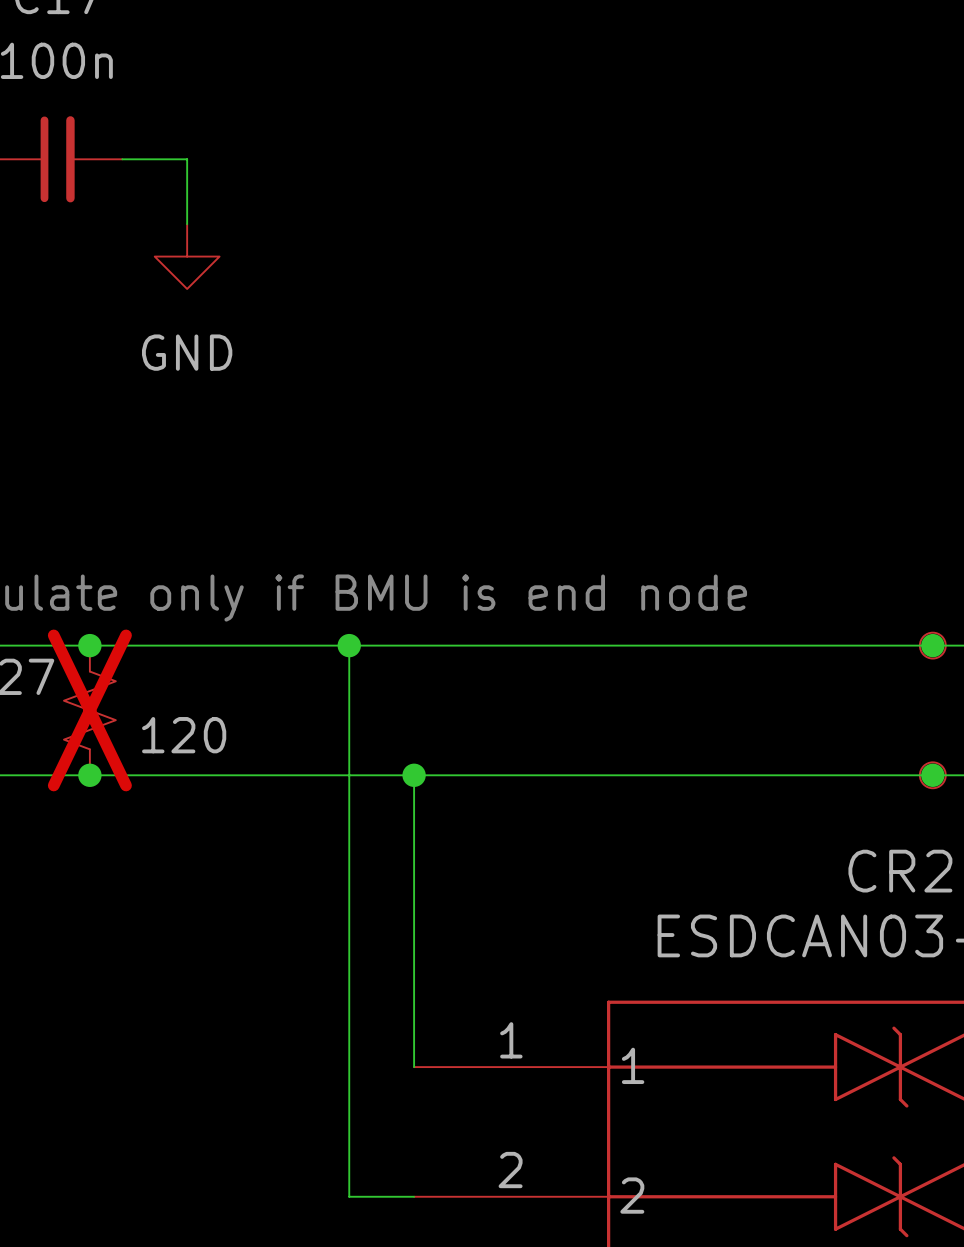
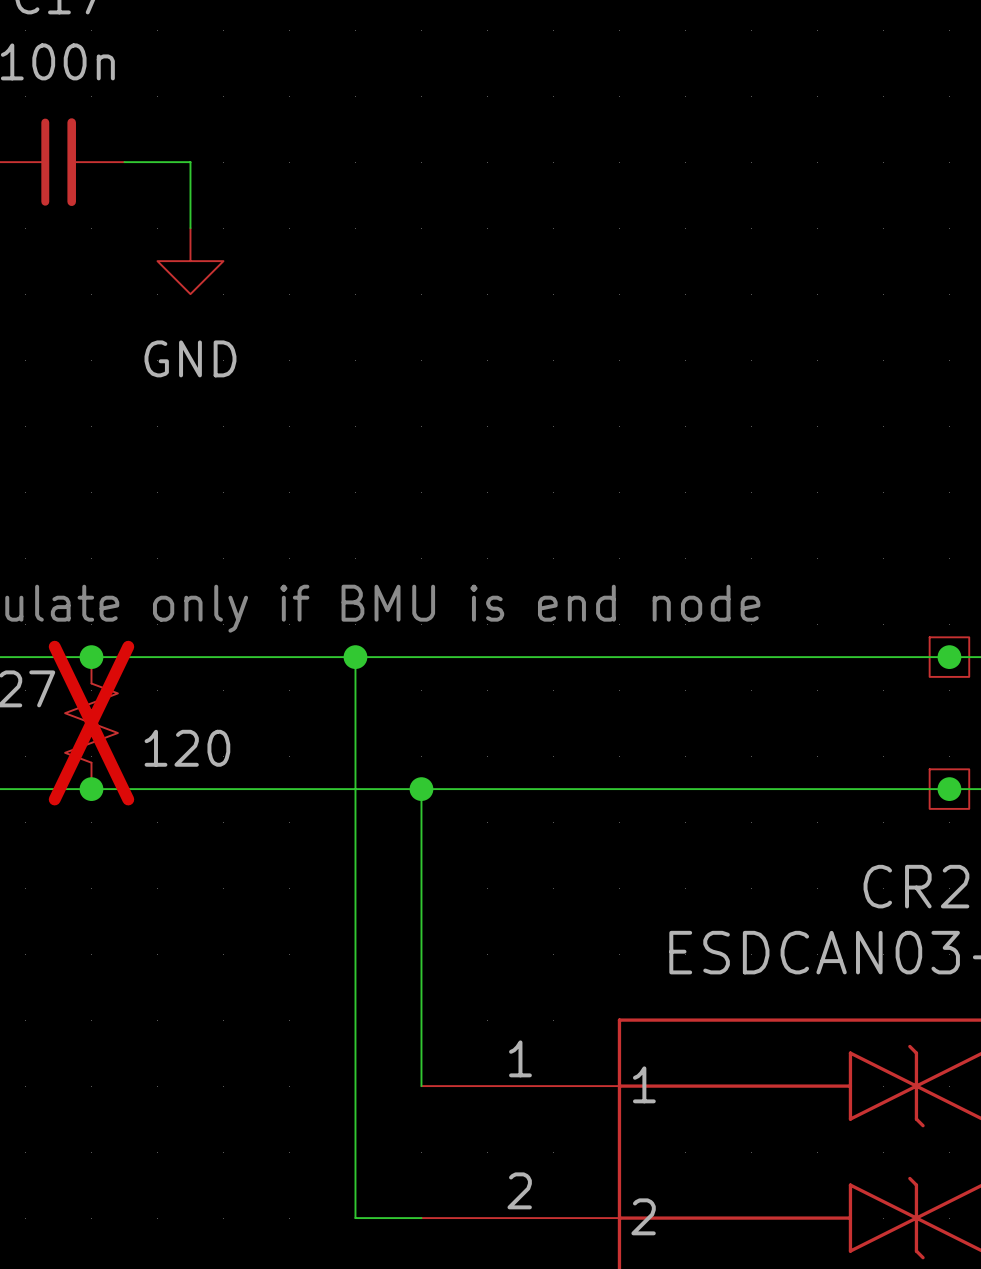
part symbol: [919, 632, 946, 659] -> [929, 637, 970, 677]
part symbol: [919, 762, 946, 789] -> [929, 769, 970, 809]

